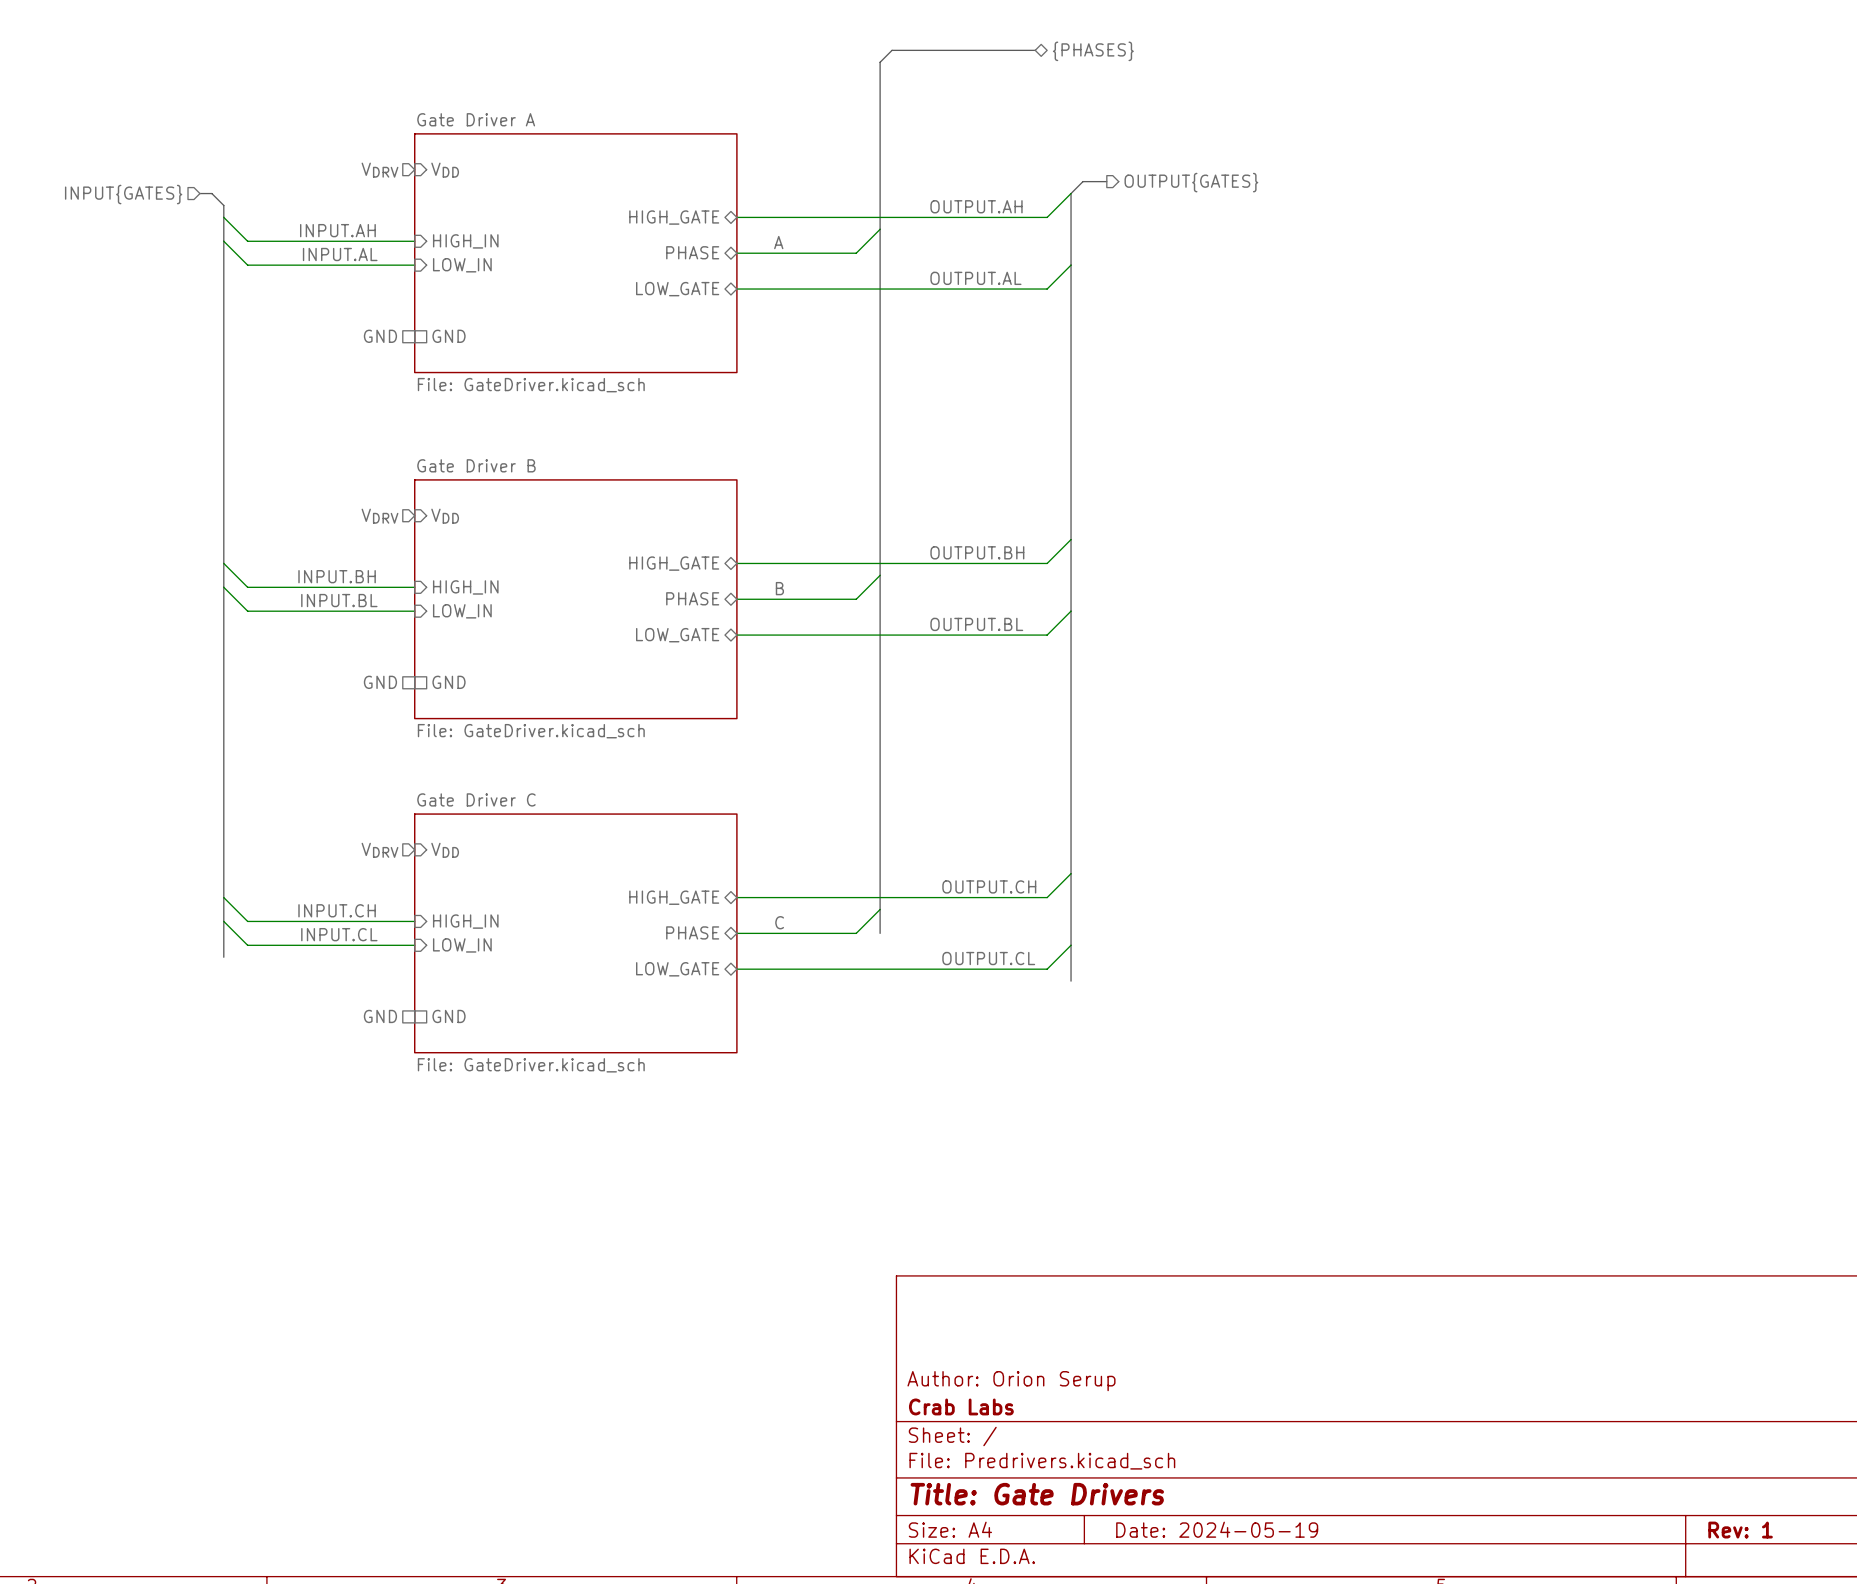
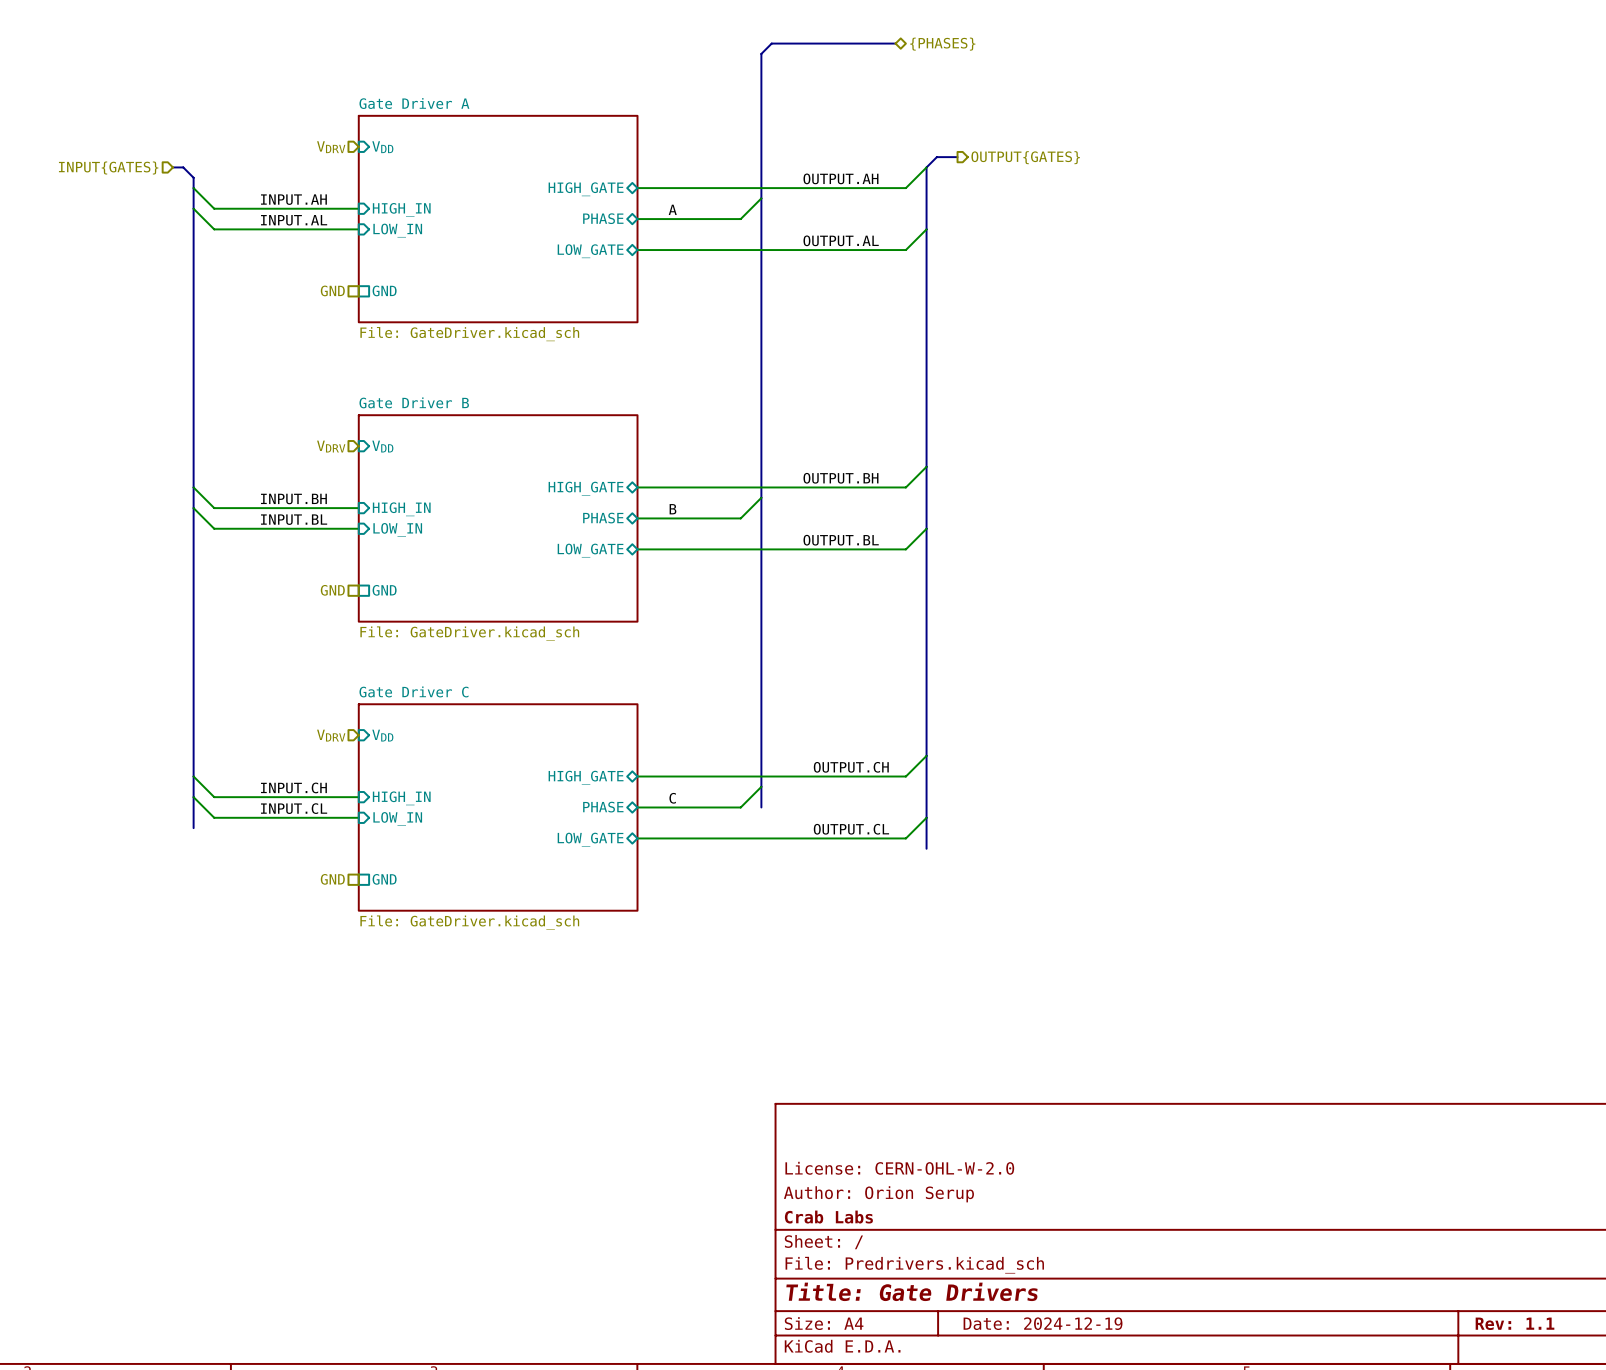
title block: none -> License: CERN-OHL-W-2.0 (899, 1168)
title block: Date: 2024-05-19 (1217, 1529) -> Date: 2024-12-19 (1043, 1323)
title block: Rev: 1 (1740, 1530) -> Rev: 1.1 (1515, 1323)

